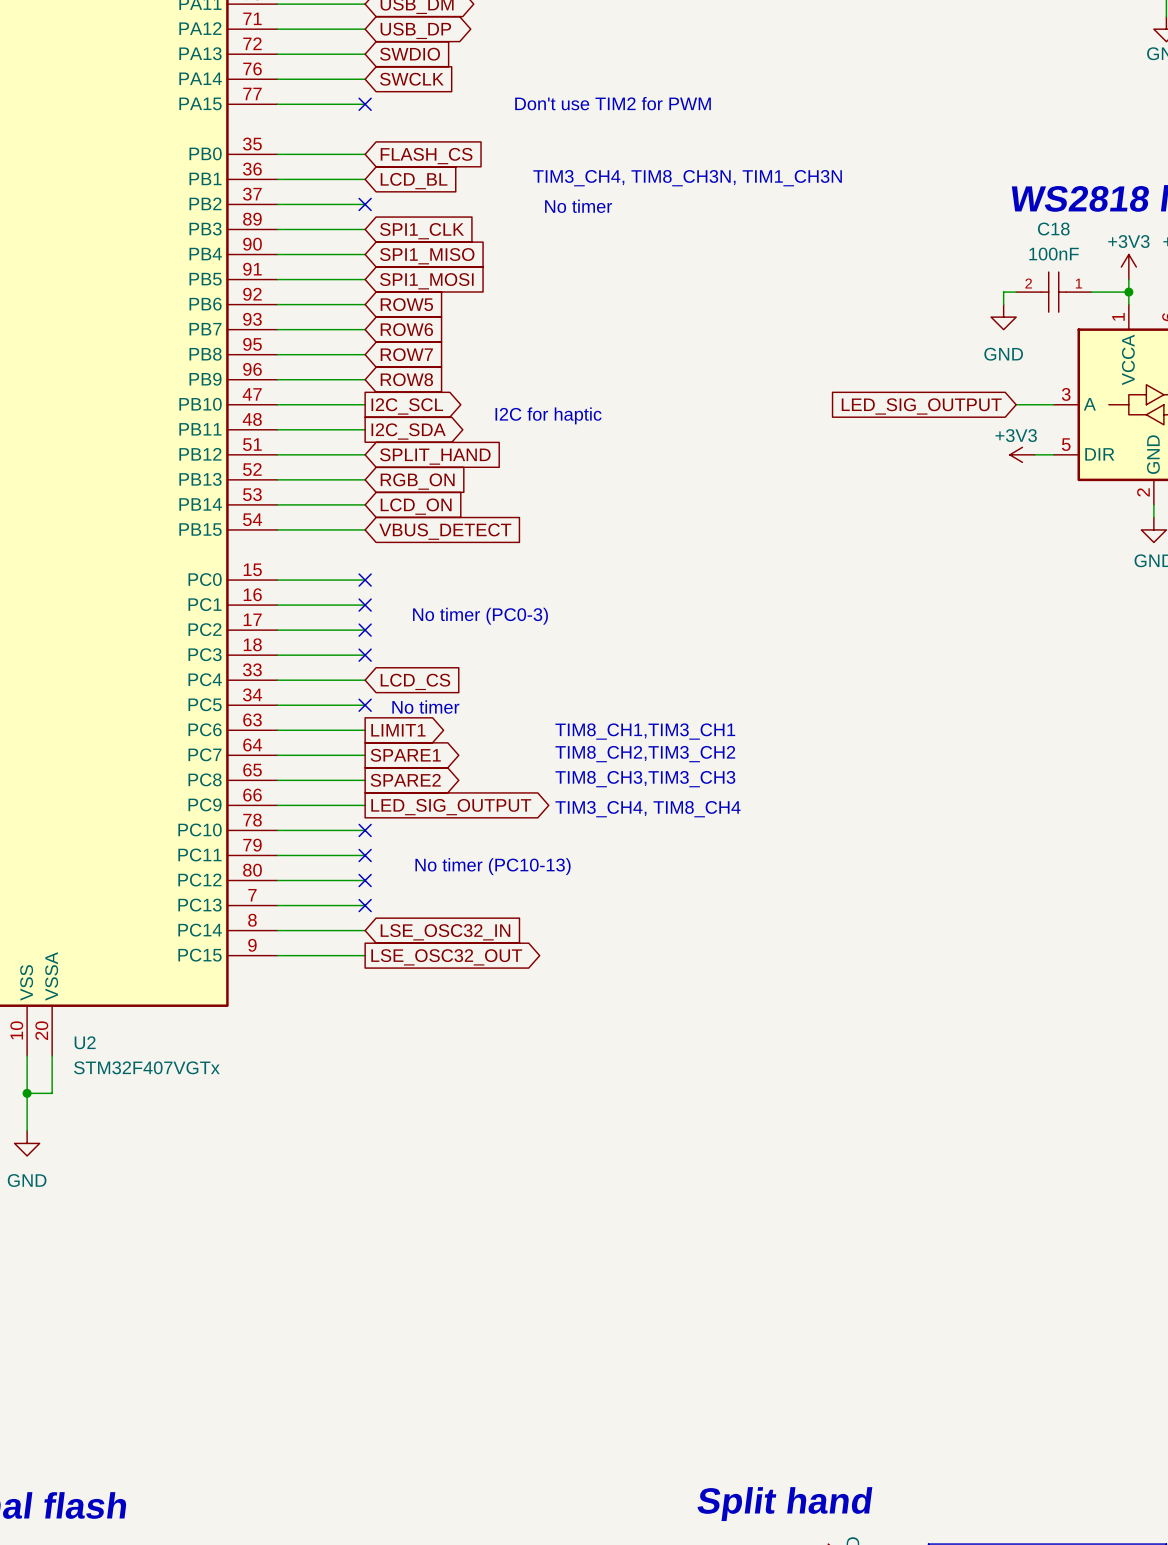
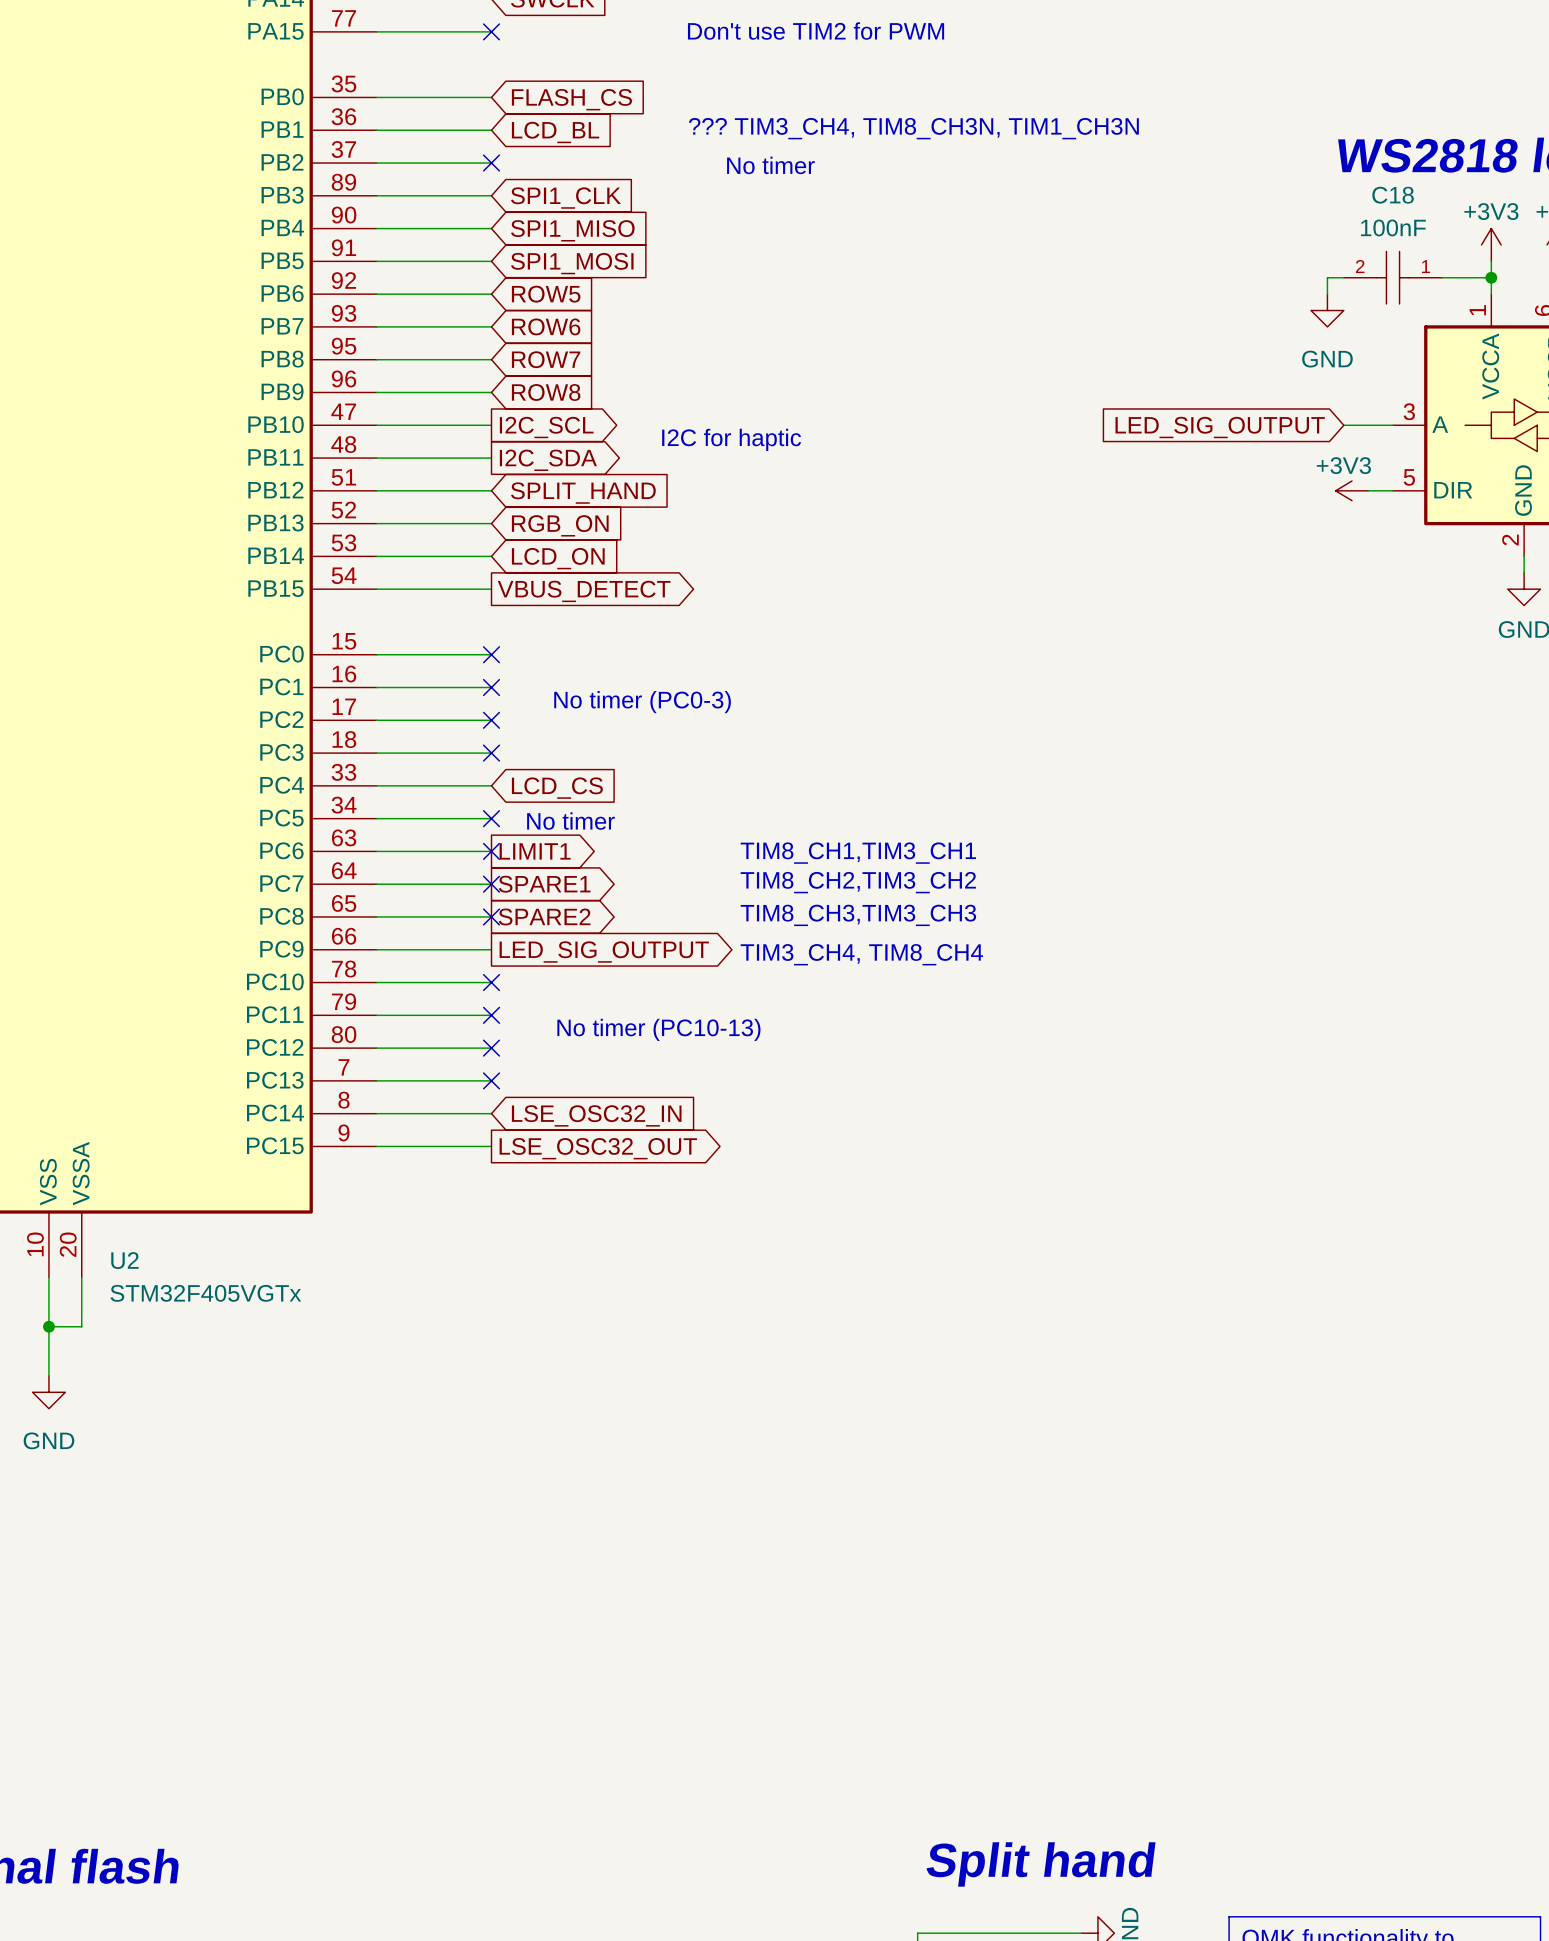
text: TIM3_CH4, TIM8_CH3N, TIM1_CH3N (687, 178) -> ??? TIM3_CH4, TIM8_CH3N, TIM1_CH3N (913, 128)
global label shape: input (445, 531) -> output (584, 591)
no-connect mark: none -> (491, 851)
no-connect mark: none -> (491, 884)
no-connect mark: none -> (491, 916)
U2 value: STM32F407VGTx (146, 1067) -> STM32F405VGTx (205, 1293)

